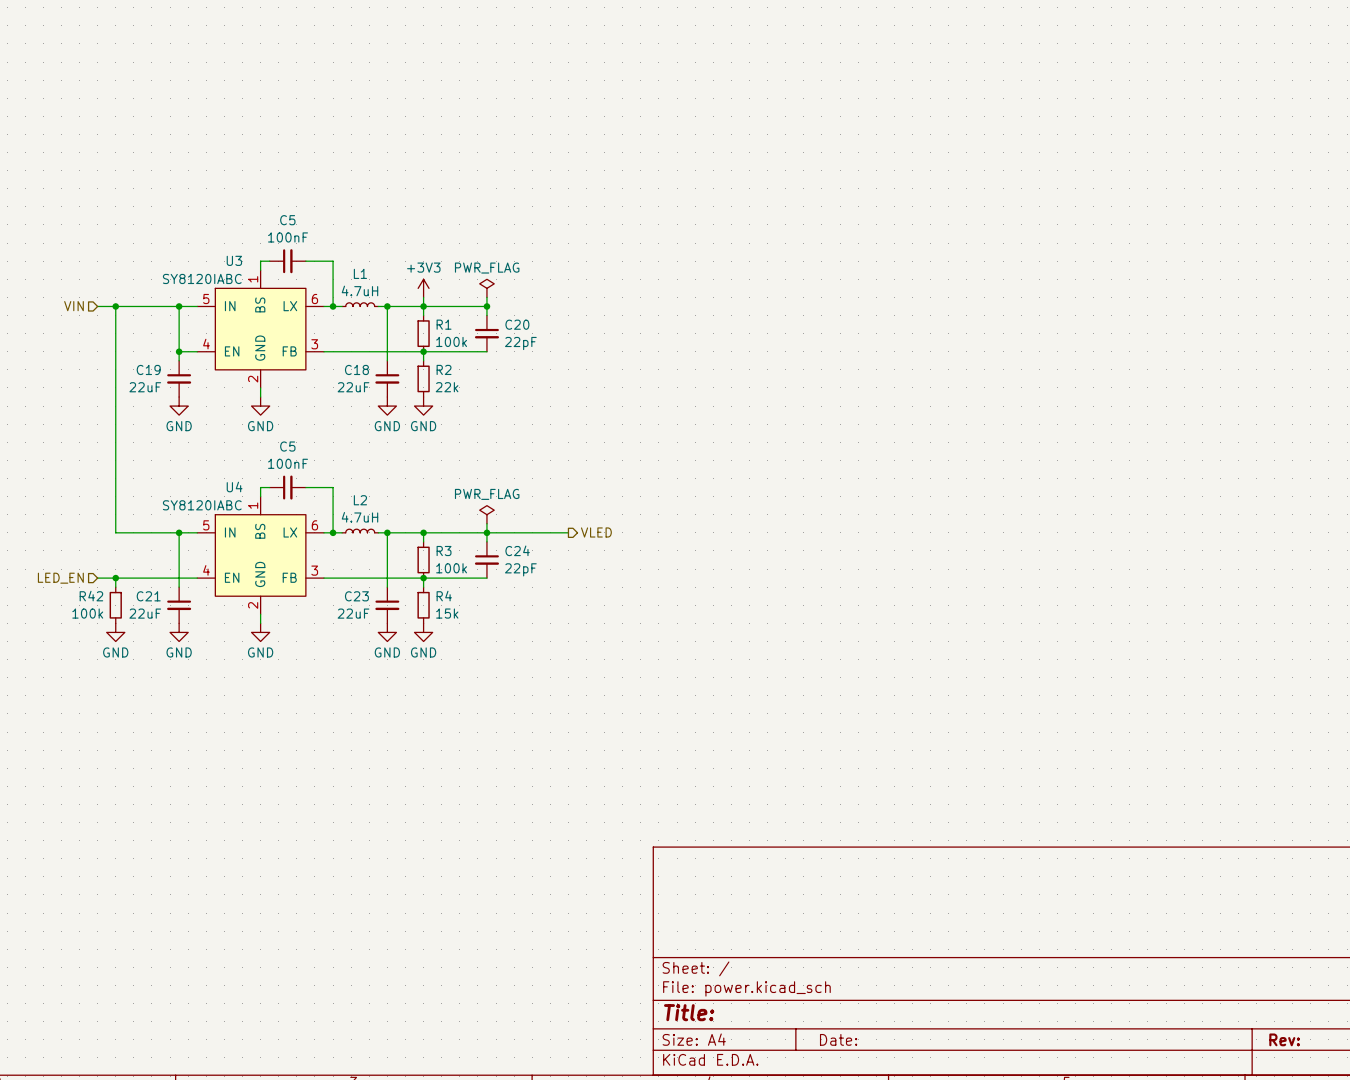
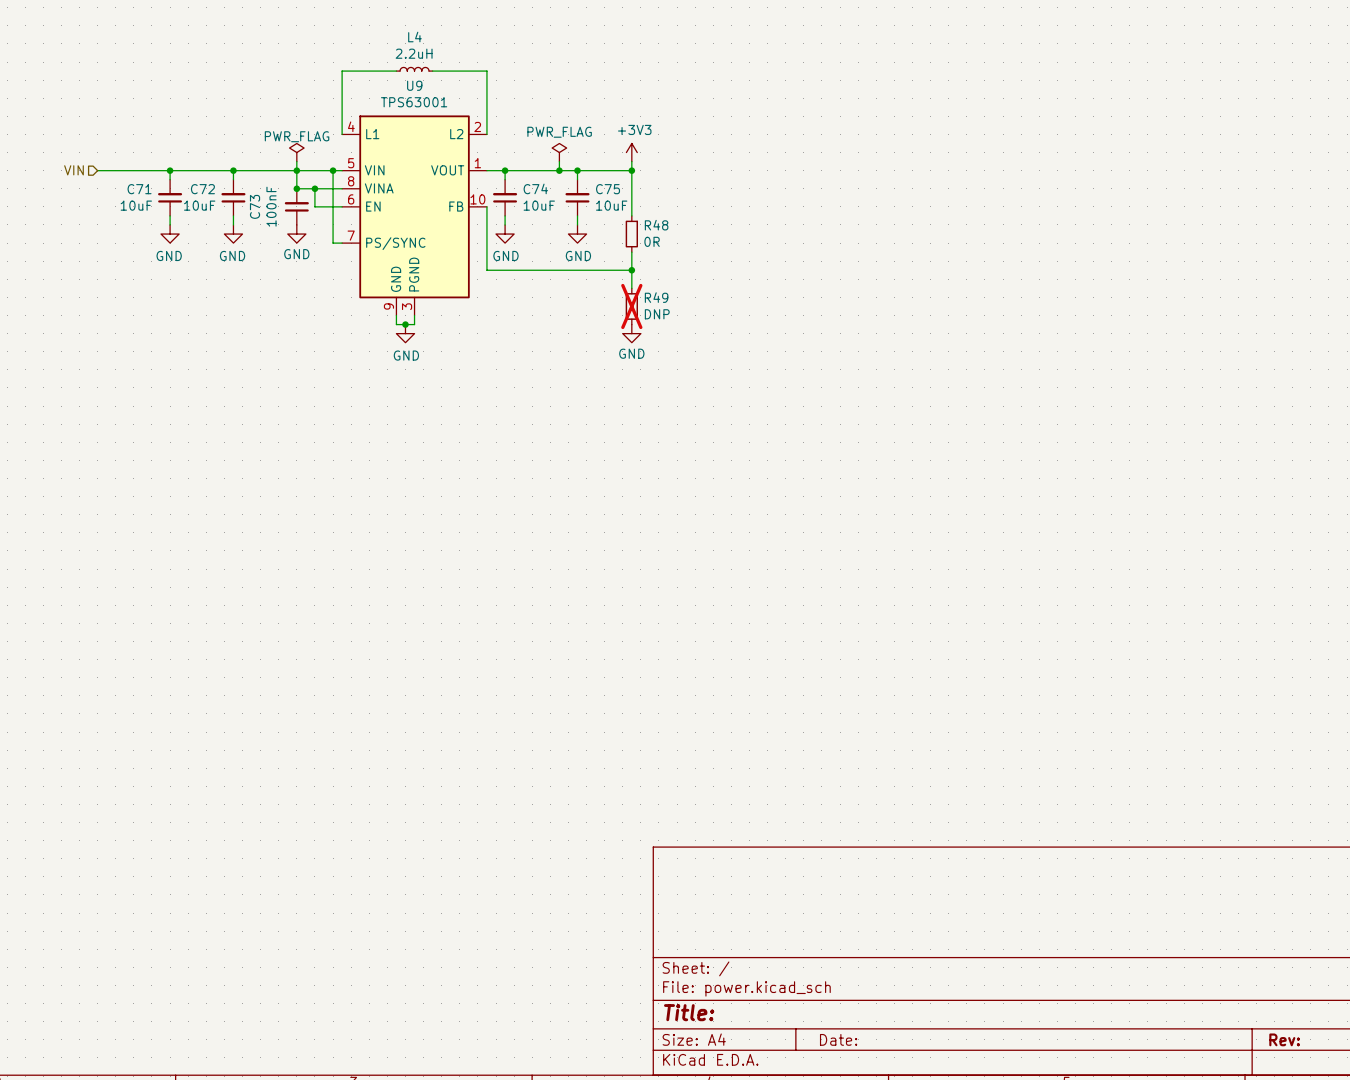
L4: none -> 2.2uH (414, 69)
wire: none -> (396, 71) (342, 71) (342, 134)
wire: none -> (432, 71) (486, 71) (486, 134)
power symbol: none -> PWR_FLAG (296, 152)
power symbol: none -> PWR_FLAG (559, 152)
power symbol: none -> +3V3 (631, 152)
wire: none -> (296, 161) (296, 188) (342, 188)
wire: none -> (559, 161) (559, 170)
wire: none -> (631, 161) (631, 215)
wire: none -> (97, 170) (342, 170)
wire: none -> (170, 170) (170, 179)
junction: none -> (170, 170)
wire: none -> (233, 170) (233, 179)
junction: none -> (233, 170)
junction: none -> (296, 170)
wire: none -> (333, 170) (333, 243) (342, 243)
junction: none -> (333, 170)
wire: none -> (486, 170) (631, 170)
wire: none -> (505, 170) (505, 179)
junction: none -> (505, 170)
junction: none -> (559, 170)
wire: none -> (577, 170) (577, 179)
junction: none -> (577, 170)
junction: none -> (631, 170)
junction: none -> (296, 188)
wire: none -> (314, 188) (314, 206) (342, 206)
junction: none -> (314, 188)
C71: none -> 10uF (170, 197)
C72: none -> 10uF (233, 197)
C74: none -> 10uF (505, 197)
C75: none -> 10uF (577, 197)
C73: none -> 100nF (296, 206)
wire: none -> (486, 206) (486, 270) (631, 270)
wire: none -> (170, 215) (170, 224)
U9: none -> TPS63001 (414, 215)
wire: none -> (577, 215) (577, 224)
power symbol: none -> GND (170, 234)
power symbol: none -> GND (233, 234)
power symbol: none -> GND (296, 234)
power symbol: none -> GND (505, 234)
power symbol: none -> GND (577, 234)
R48: none -> 0R (631, 234)
wire: none -> (631, 252) (631, 288)
wire: (269, 261) (260, 261) (260, 270) -> none
C5: 100nF (287, 261) -> none
wire: (305, 261) (333, 261) (333, 306) -> none
junction: none -> (631, 270)
power symbol: +3V3 (423, 288) -> none
power symbol: PWR_FLAG (486, 288) -> none
wire: (423, 297) (423, 315) -> none
wire: (486, 297) (486, 315) -> none
L1: 4.7uH (360, 304) -> none
hierarchical label position: VIN (74, 306) -> VIN (74, 170)
wire: (97, 306) (197, 306) -> none
wire: (115, 306) (115, 532) (197, 532) -> none
junction: (115, 306) -> none
wire: (179, 306) (179, 360) -> none
junction: (179, 306) -> none
wire: (323, 306) (342, 306) -> none
junction: (333, 306) -> none
wire: (378, 306) (486, 306) -> none
wire: (387, 306) (387, 360) -> none
junction: (387, 306) -> none
junction: (423, 306) -> none
junction: (486, 306) -> none
R49: none -> DNP (631, 306)
wire: none -> (396, 315) (396, 324) (414, 324) (414, 315)
junction: none -> (405, 324)
U3: SY8120IABC (260, 329) -> none
power symbol: none -> GND (405, 333)
R1: 100k (423, 333) -> none
C20: 22pF (486, 333) -> none
power symbol: none -> GND (631, 333)
wire: (179, 351) (197, 351) -> none
junction: (179, 351) -> none
wire: (323, 351) (486, 351) -> none
wire: (423, 351) (423, 360) -> (505, 215) (505, 224)
junction: (423, 351) -> none
C19: 22uF (179, 378) -> none
C18: 22uF (387, 378) -> none
R2: 22k (423, 378) -> none
wire: (260, 387) (260, 397) -> (233, 215) (233, 224)
power symbol: GND (179, 406) -> none
power symbol: GND (260, 406) -> none
power symbol: GND (387, 406) -> none
power symbol: GND (423, 406) -> none
wire: (269, 487) (260, 487) (260, 496) -> none
C5: 100nF (287, 487) -> none
wire: (305, 487) (333, 487) (333, 532) -> none
power symbol: PWR_FLAG (486, 514) -> none
wire: (486, 523) (486, 541) -> none
L2: 4.7uH (360, 531) -> none
wire: (179, 532) (179, 587) -> none
junction: (179, 532) -> none
wire: (323, 532) (342, 532) -> none
junction: (333, 532) -> none
wire: (378, 532) (568, 532) -> none
wire: (387, 532) (387, 587) -> none
junction: (387, 532) -> none
wire: (423, 532) (423, 541) -> none
junction: (423, 532) -> none
junction: (486, 532) -> none
hierarchical label: VLED (596, 532) -> none
U4: SY8120IABC (260, 555) -> none
R3: 100k (423, 559) -> none
C24: 22pF (486, 559) -> none
hierarchical label: LED_EN (60, 578) -> none
wire: (97, 578) (197, 578) -> none
wire: (115, 578) (115, 587) -> none
junction: (115, 578) -> none
wire: (323, 578) (486, 578) -> none
wire: (423, 578) (423, 587) -> none
junction: (423, 578) -> none
R42: 100k (115, 605) -> none
C21: 22uF (179, 605) -> none
C23: 22uF (387, 605) -> none
R4: 15k (423, 605) -> none
wire: (260, 614) (260, 623) -> none
power symbol: GND (115, 632) -> none
power symbol: GND (179, 632) -> none
power symbol: GND (260, 632) -> none
power symbol: GND (387, 632) -> none
power symbol: GND (423, 632) -> none

